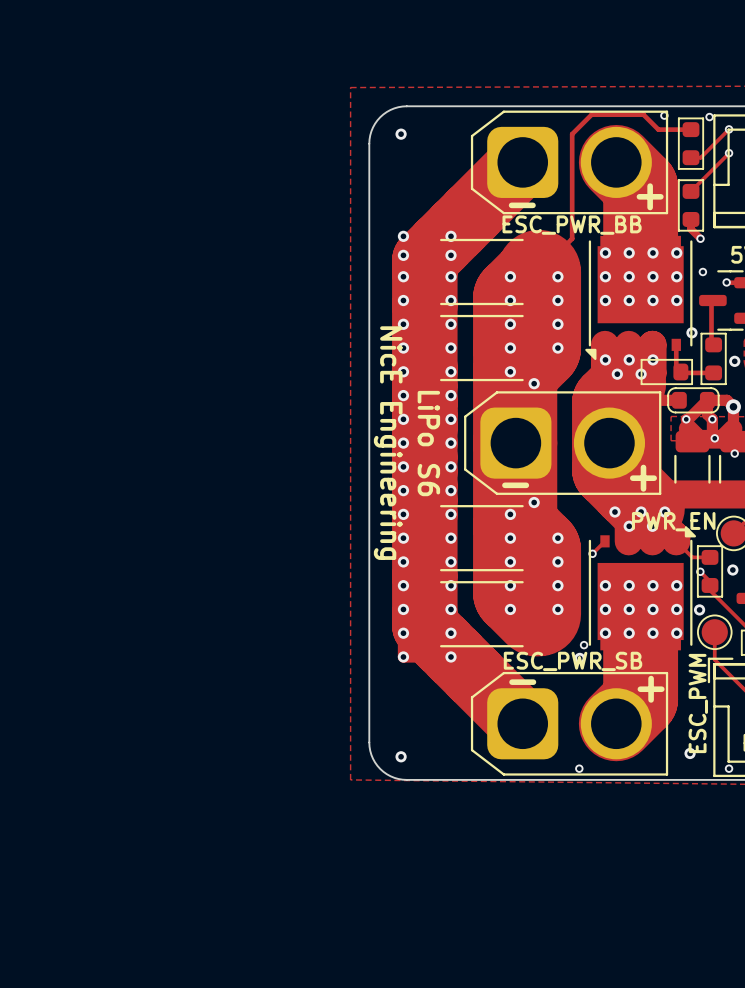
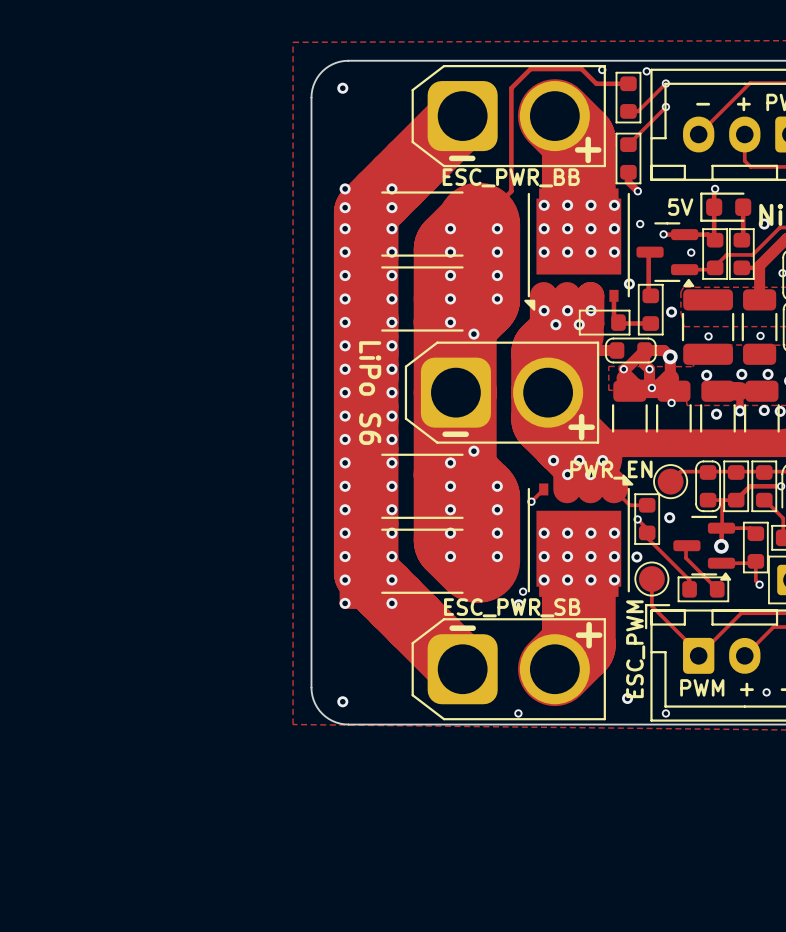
text: NicE Engineering (388, 443) -> none

